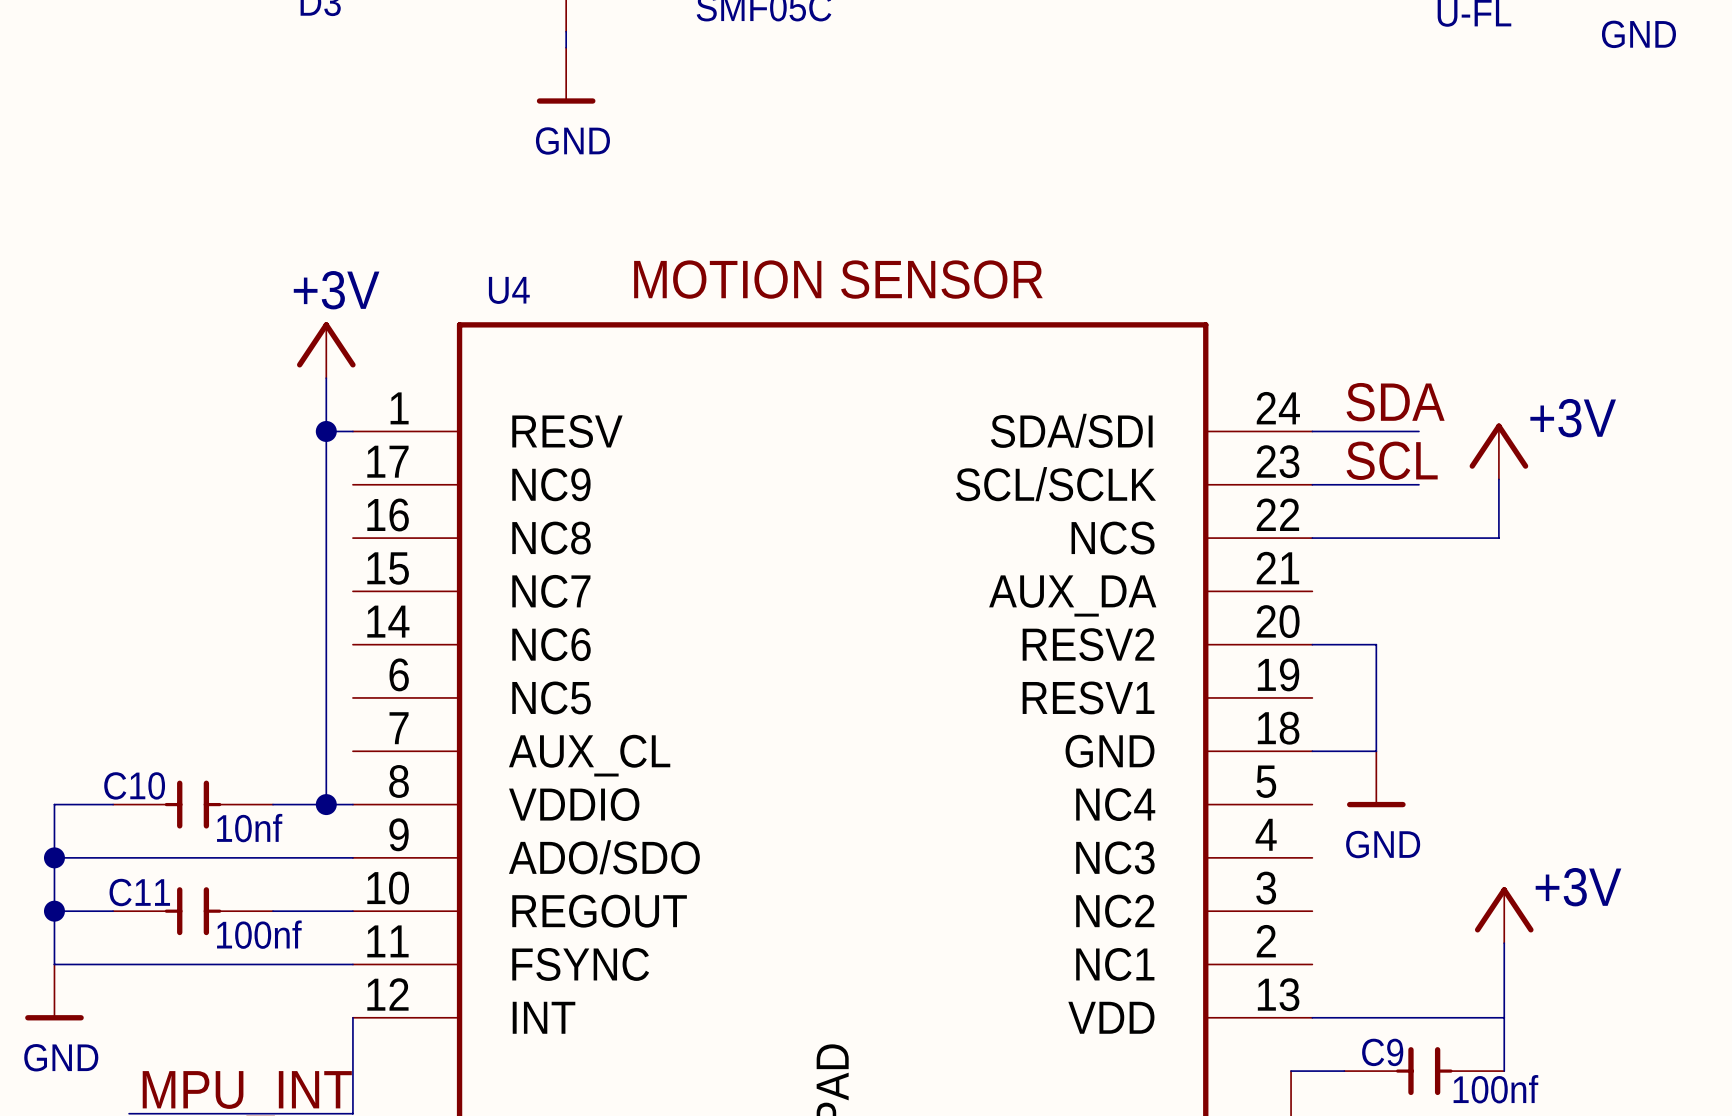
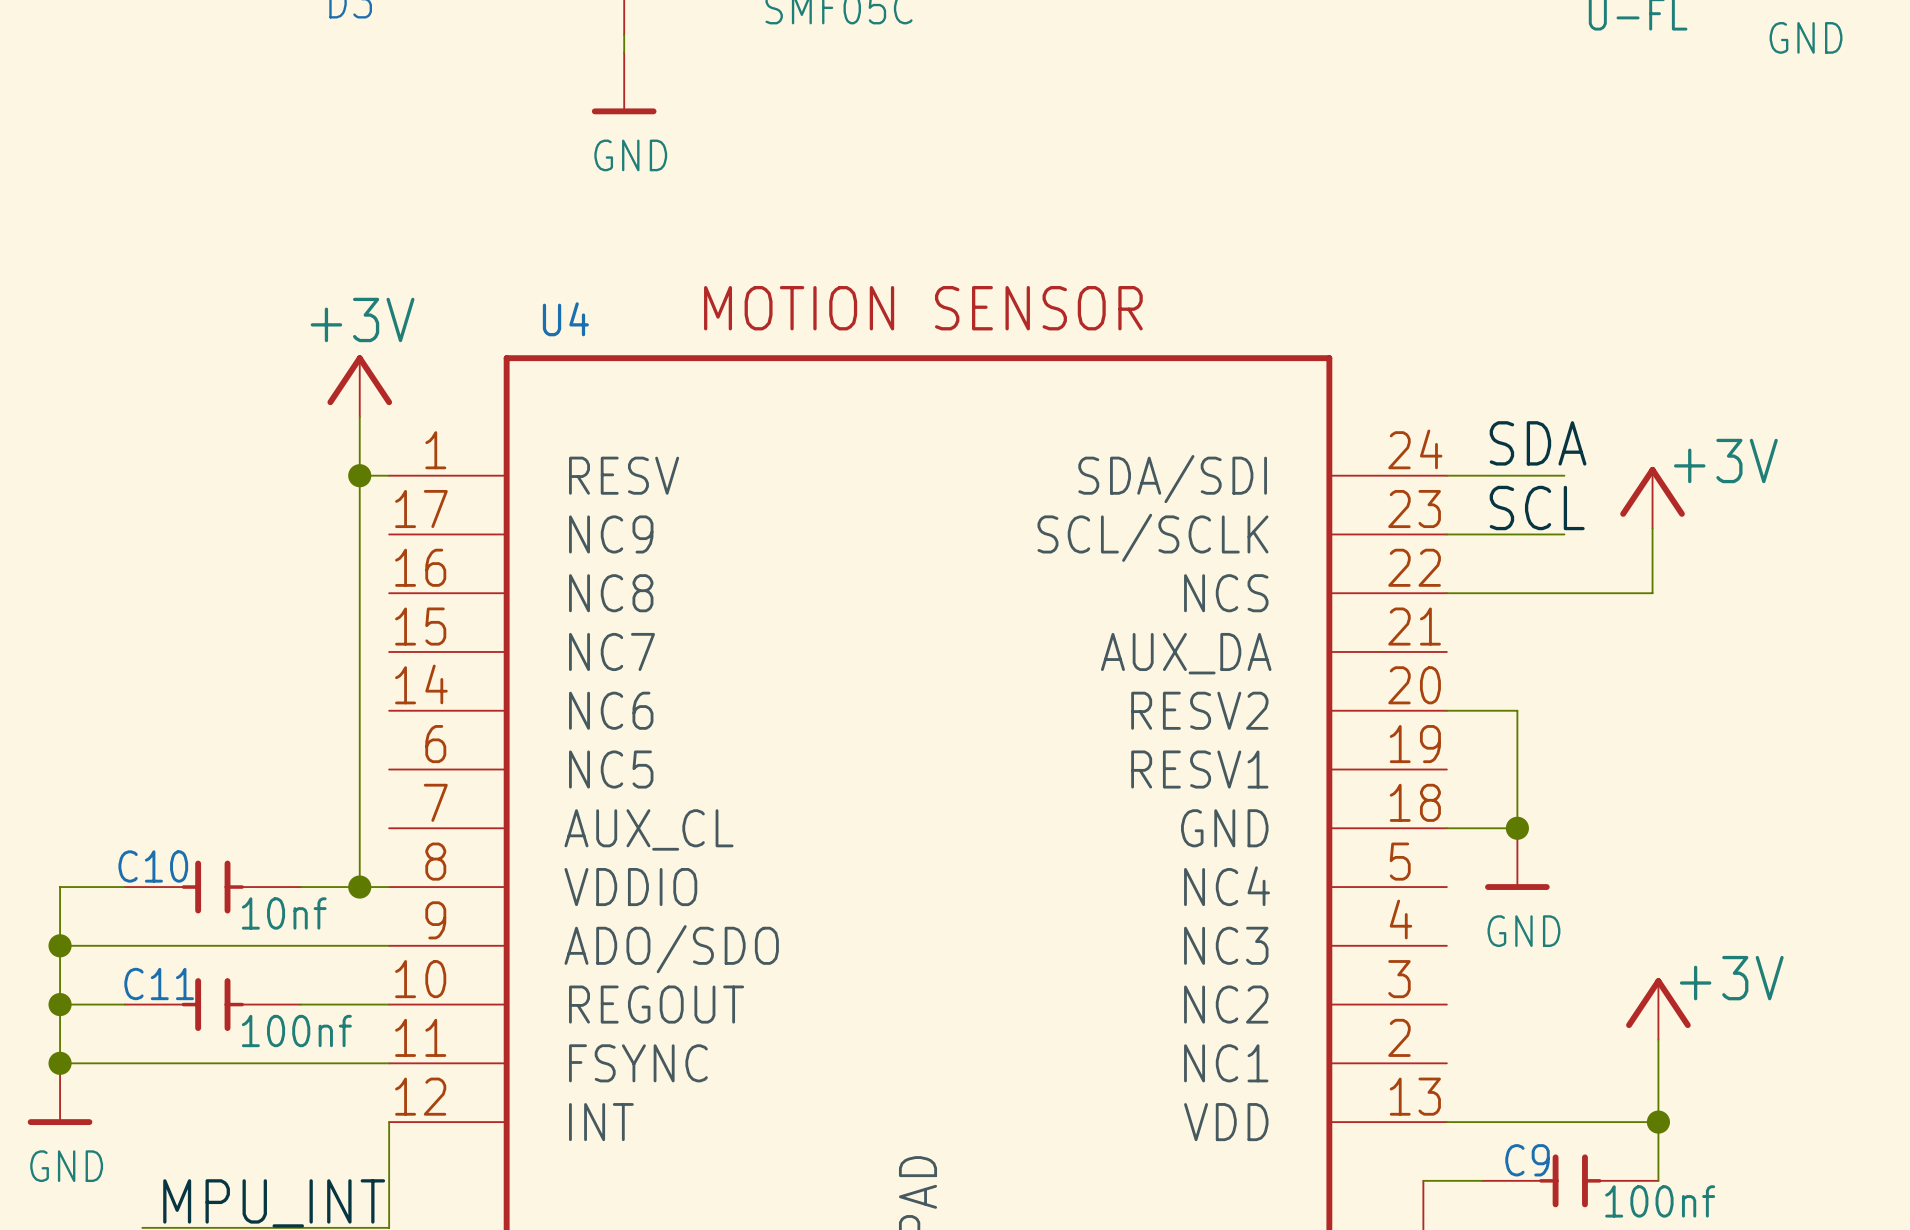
junction: none -> (1517, 828)
junction: none -> (60, 1063)
junction: none -> (1658, 1122)

